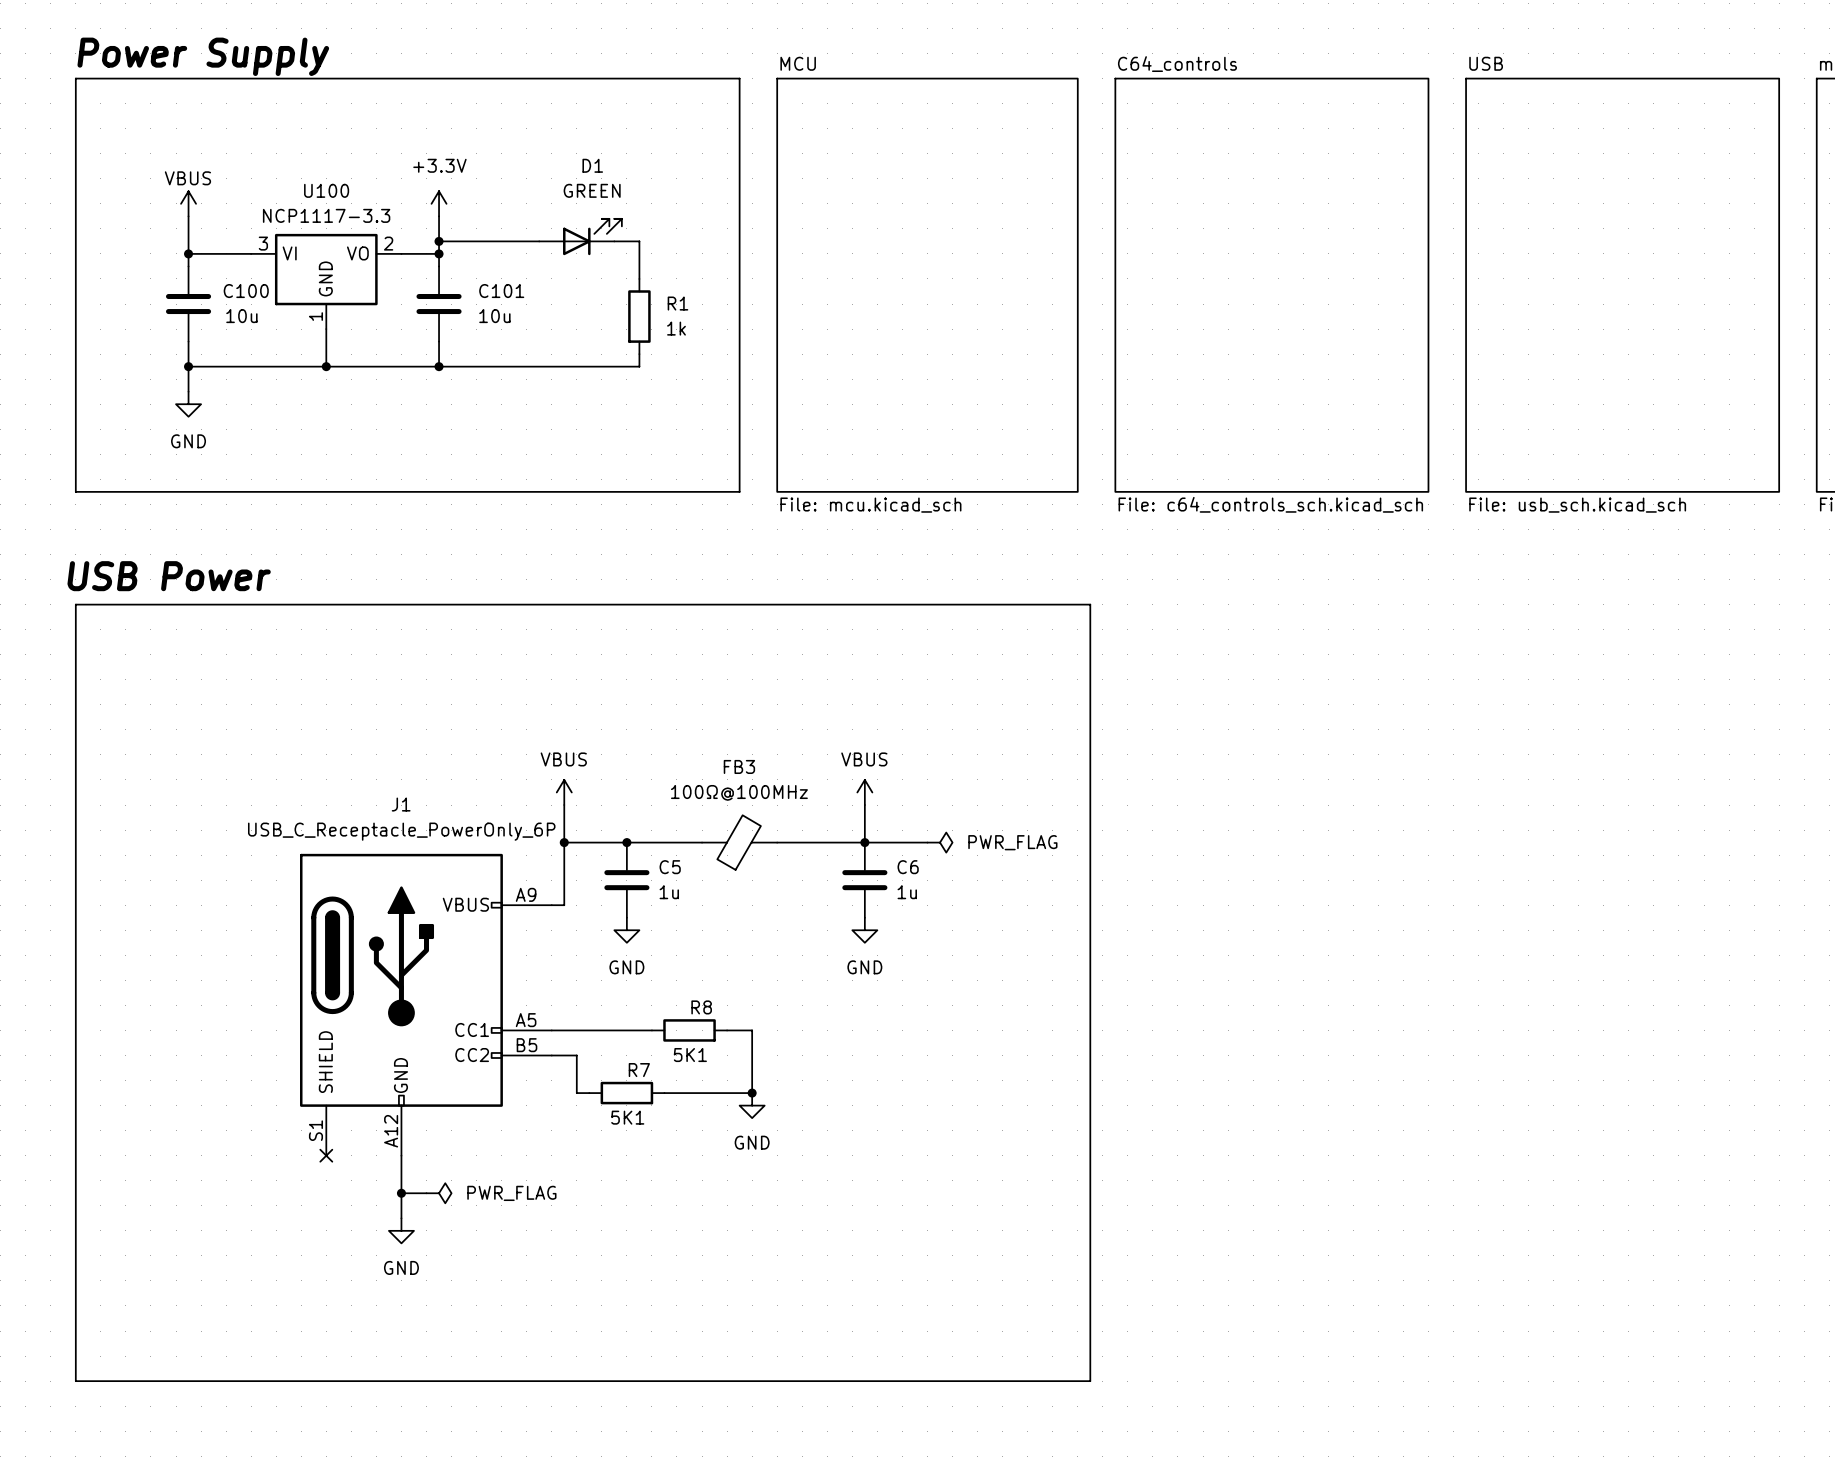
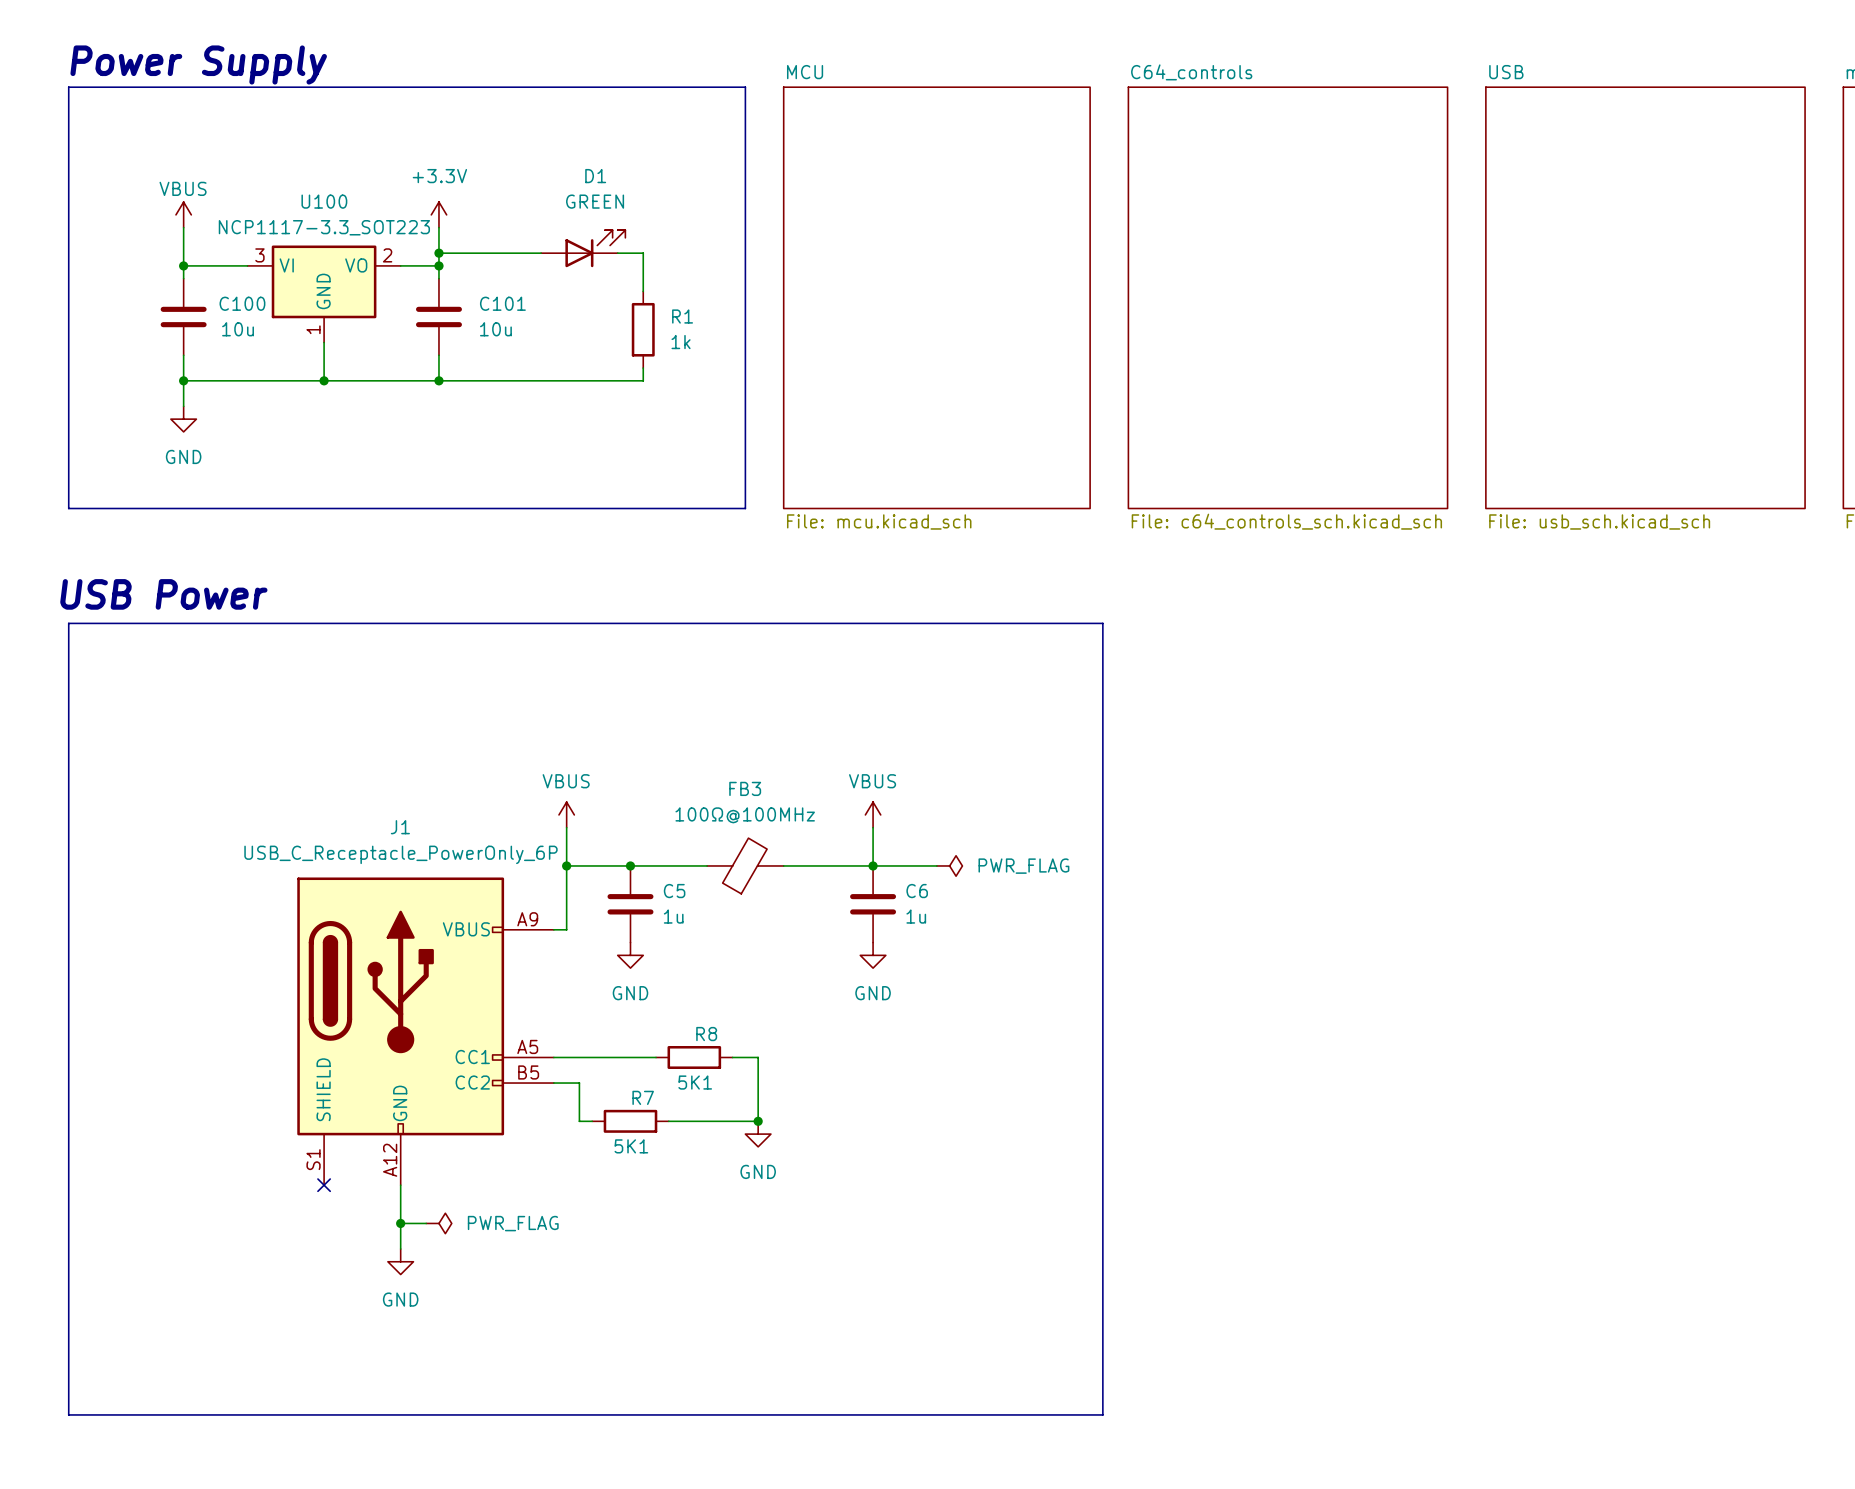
U100 value: NCP1117-3.3 (326, 215) -> NCP1117-3.3_SOT223 (324, 227)

